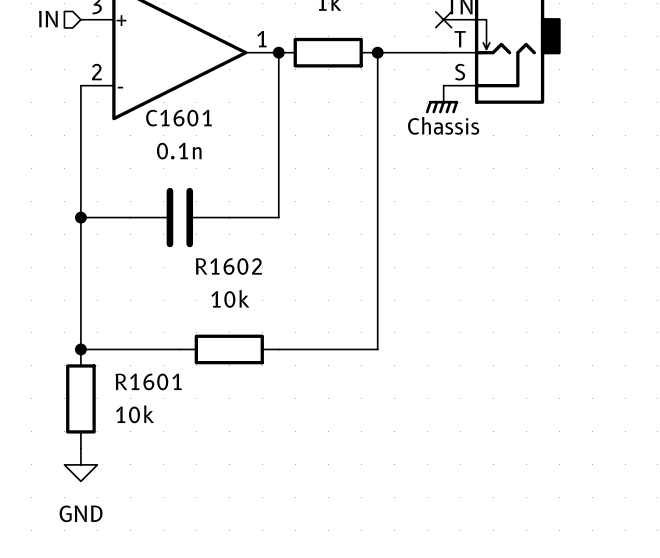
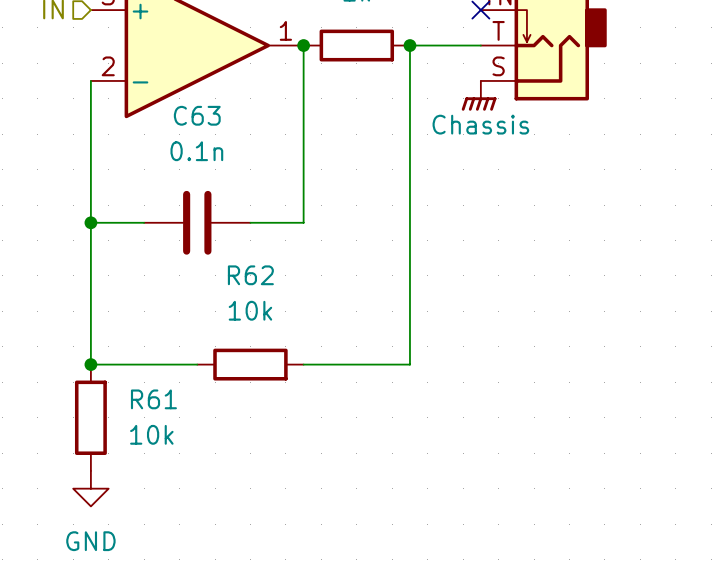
C1601 name: C1601 (178, 118) -> C63 (197, 115)
R1602 name: R1602 (228, 266) -> R62 (250, 275)
R1601 name: R1601 (148, 381) -> R61 (153, 399)

